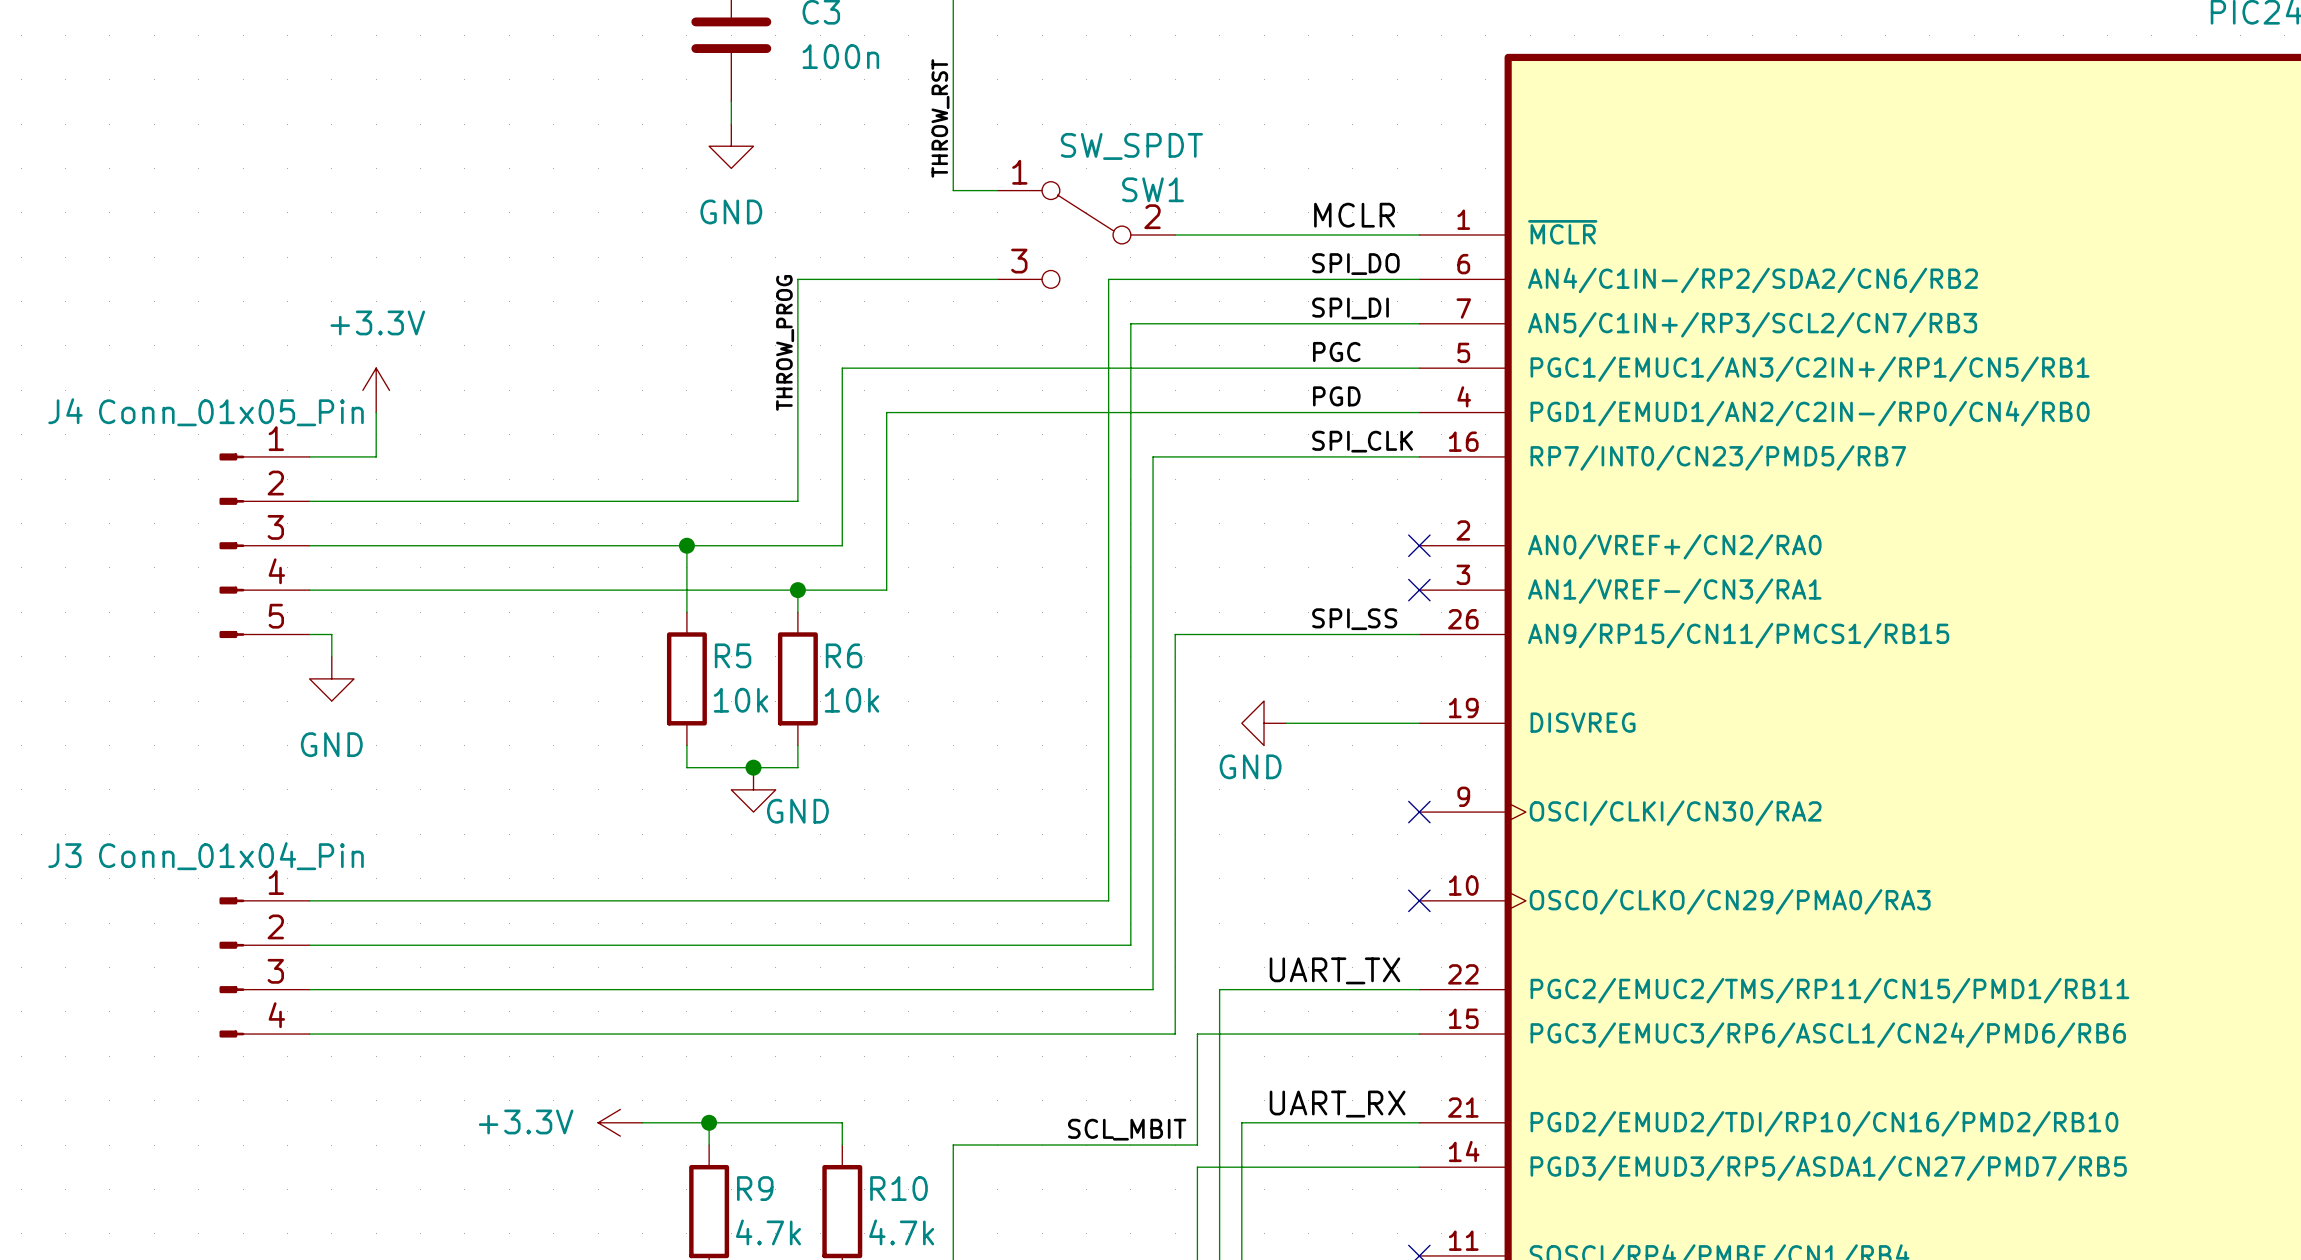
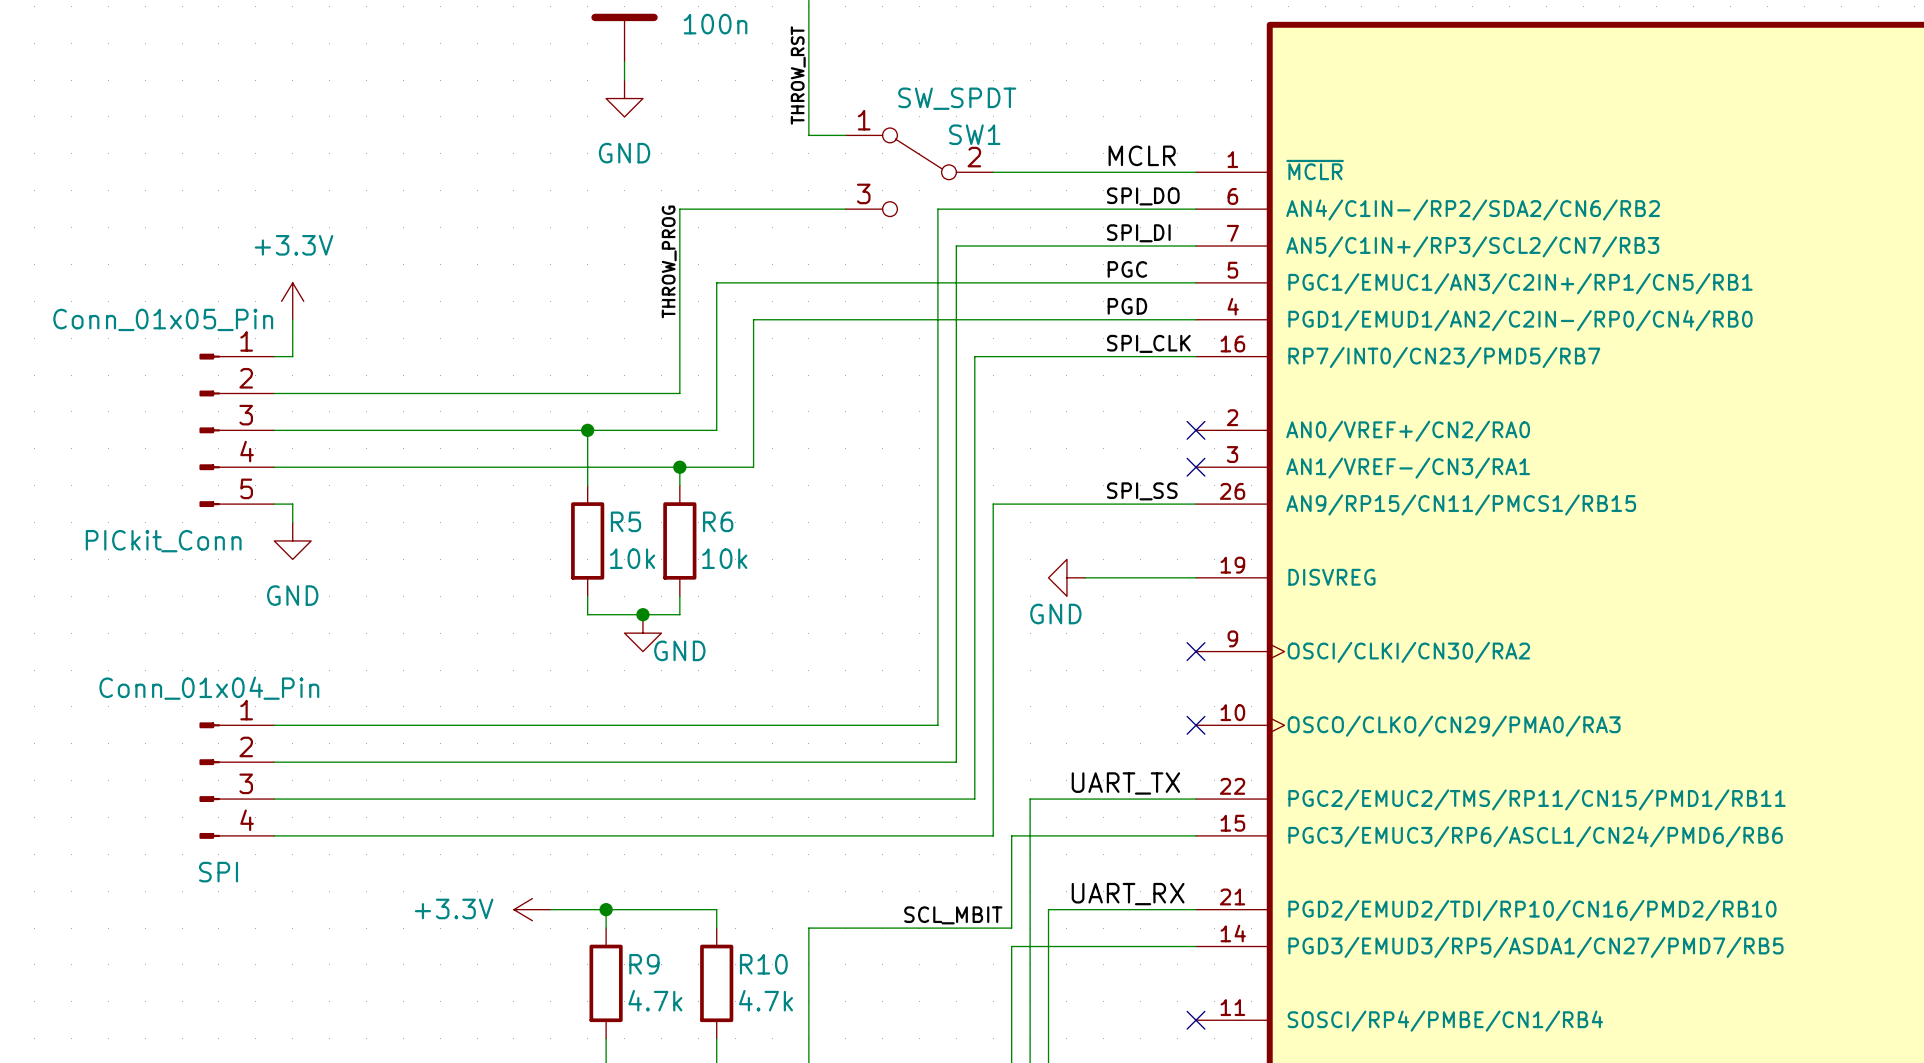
power symbol position: +3.3V (376, 390) -> +3.3V (292, 301)
J4 name: J4 (65, 411) -> PICkit_Conn (163, 541)
J4 value position: Conn_01x05_Pin (231, 412) -> Conn_01x05_Pin (163, 319)
wire: (376, 412) (376, 456) (331, 456) -> (292, 319) (292, 356)
J3 name: J3 (64, 855) -> SPI (218, 872)

